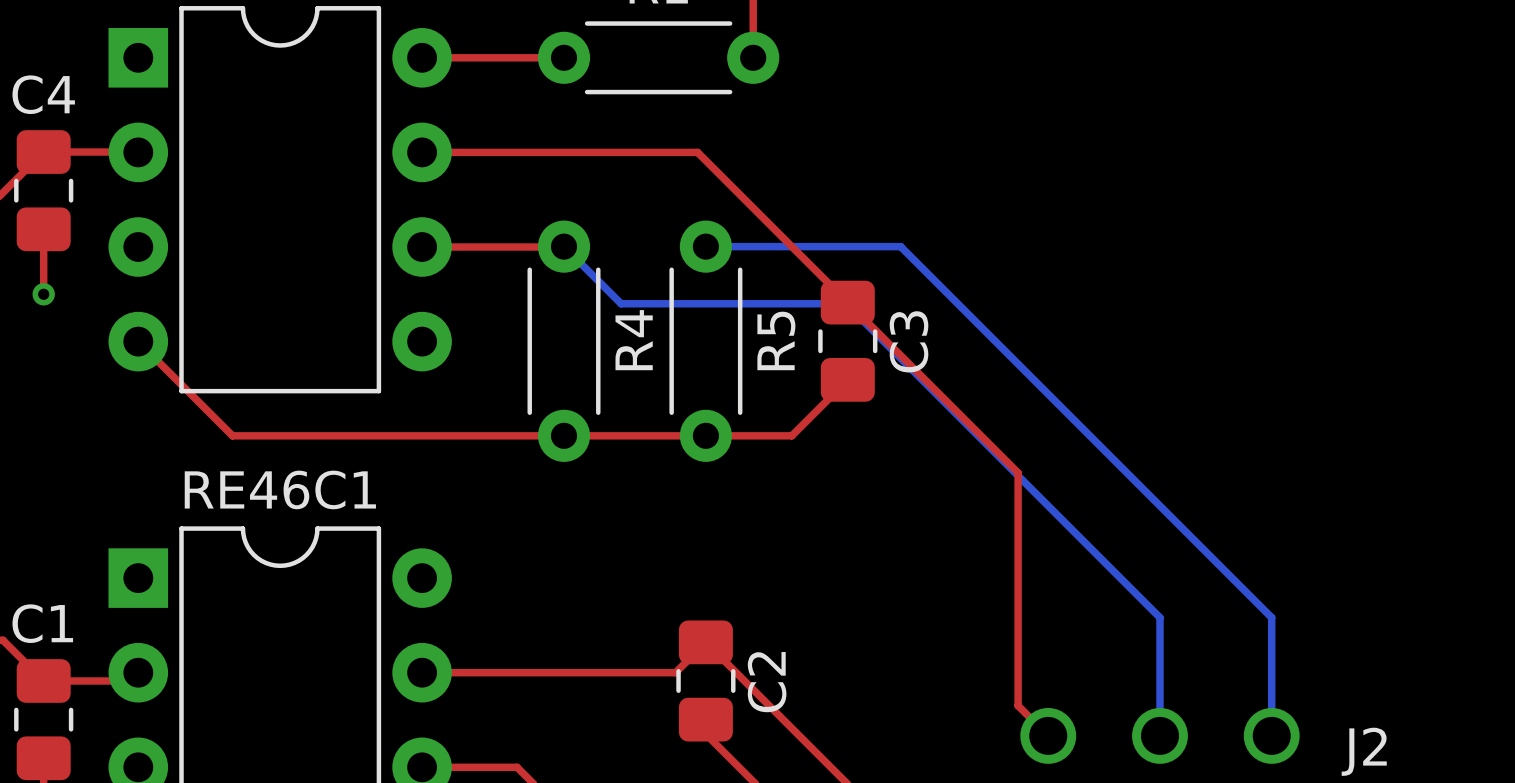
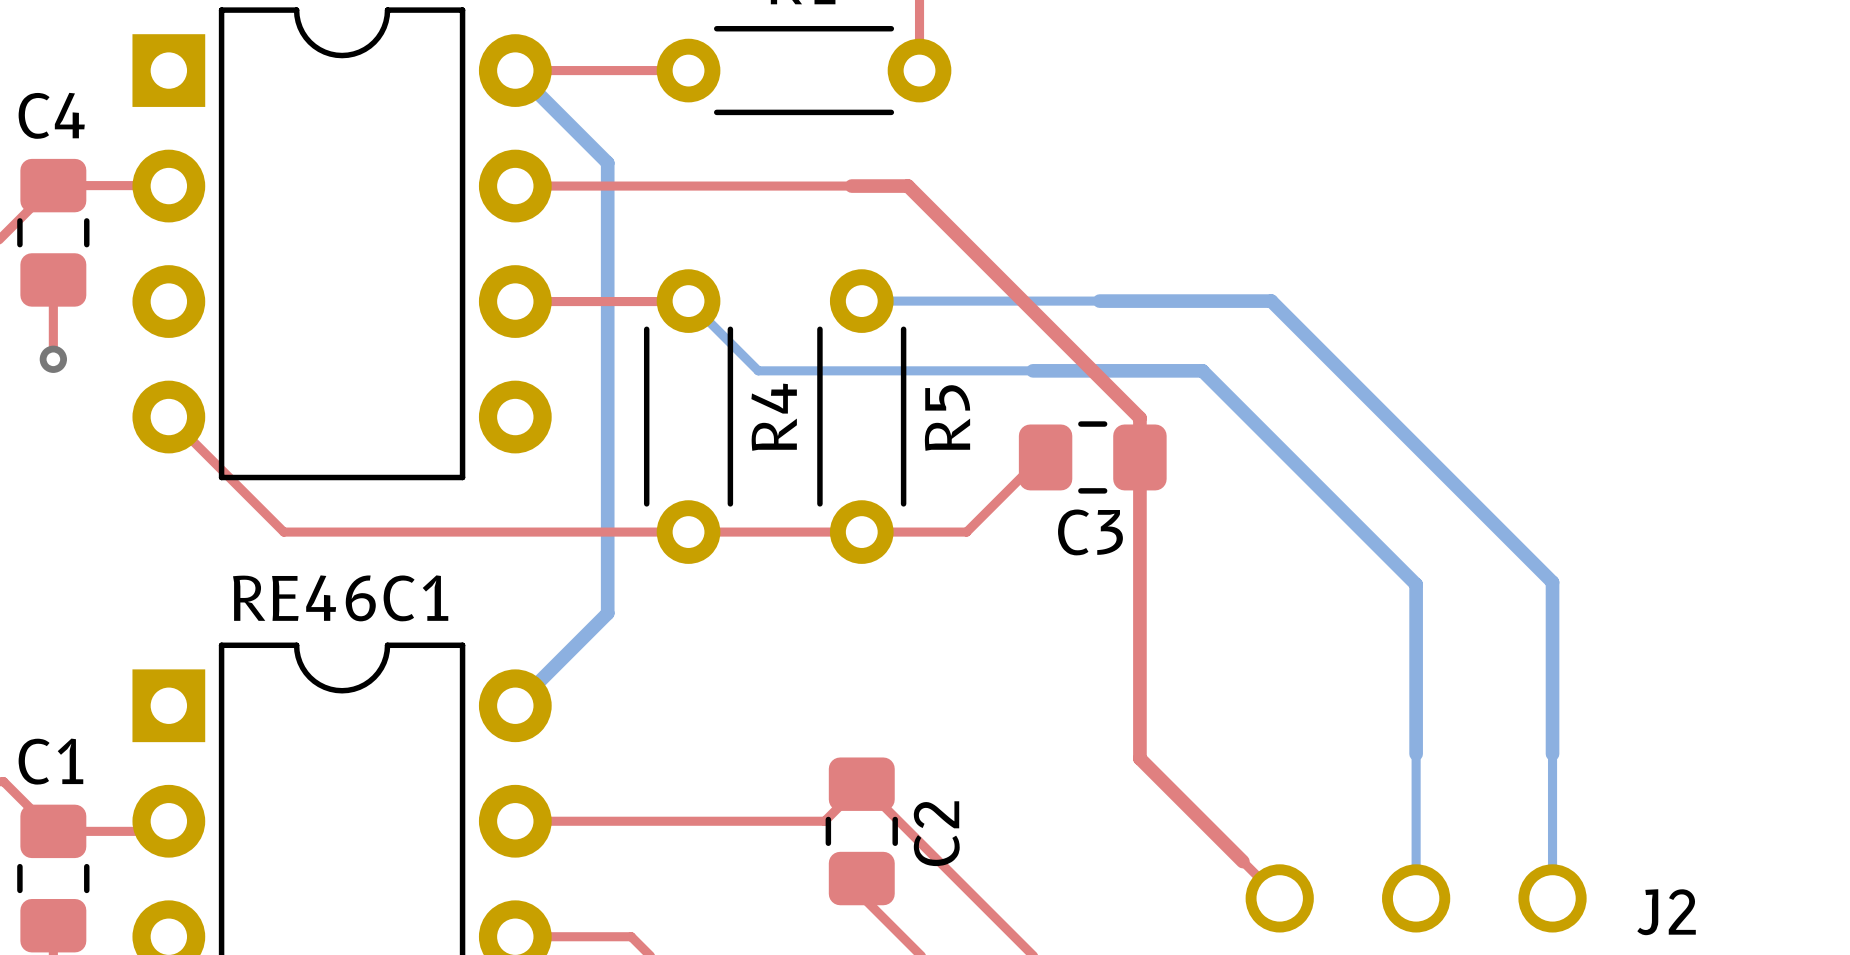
bottom track: none -> (515, 70) (607, 162) (607, 613) (515, 705)
top track: (697, 152) (1018, 472) (1018, 705) -> (851, 186) (907, 186) (1139, 418) (1139, 758) (1242, 861)
bottom track: (900, 246) (1271, 617) -> (1099, 301) (1271, 301) (1552, 582) (1552, 754)
bottom track: (846, 303) (1159, 617) -> (1032, 370) (1202, 370) (1416, 584) (1416, 754)
C3 rotation: 0° (847, 341) -> 90° clockwise (1092, 457)

